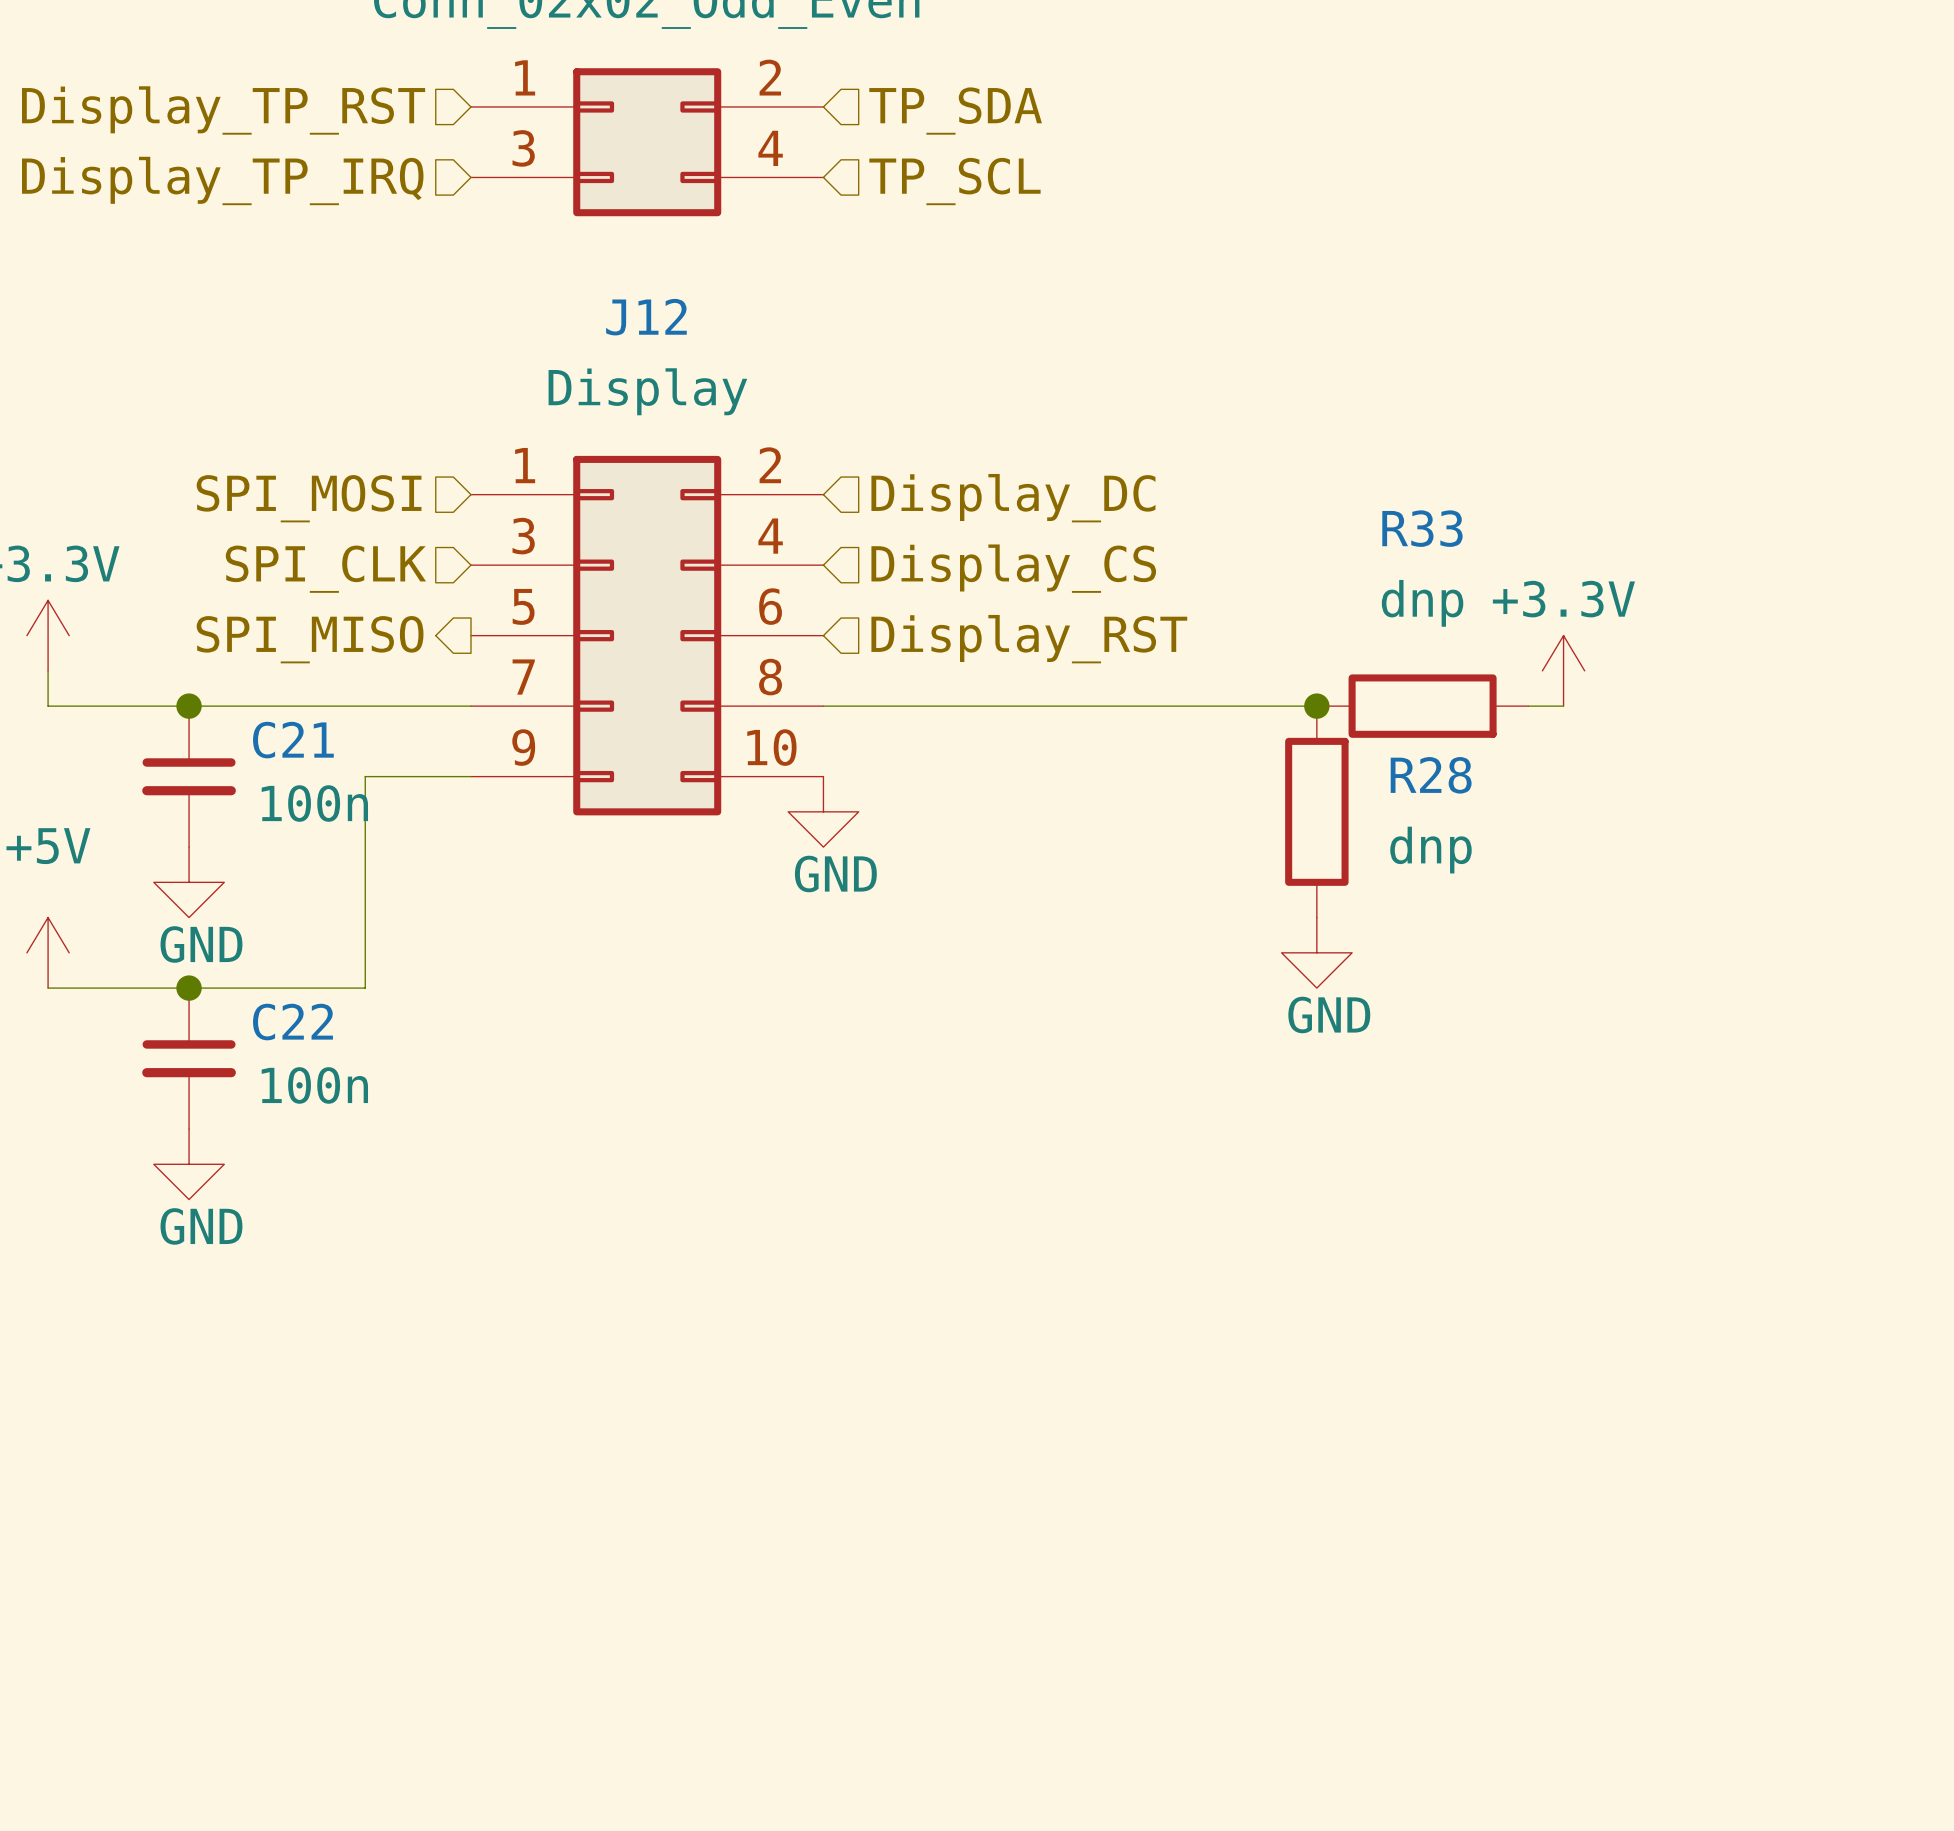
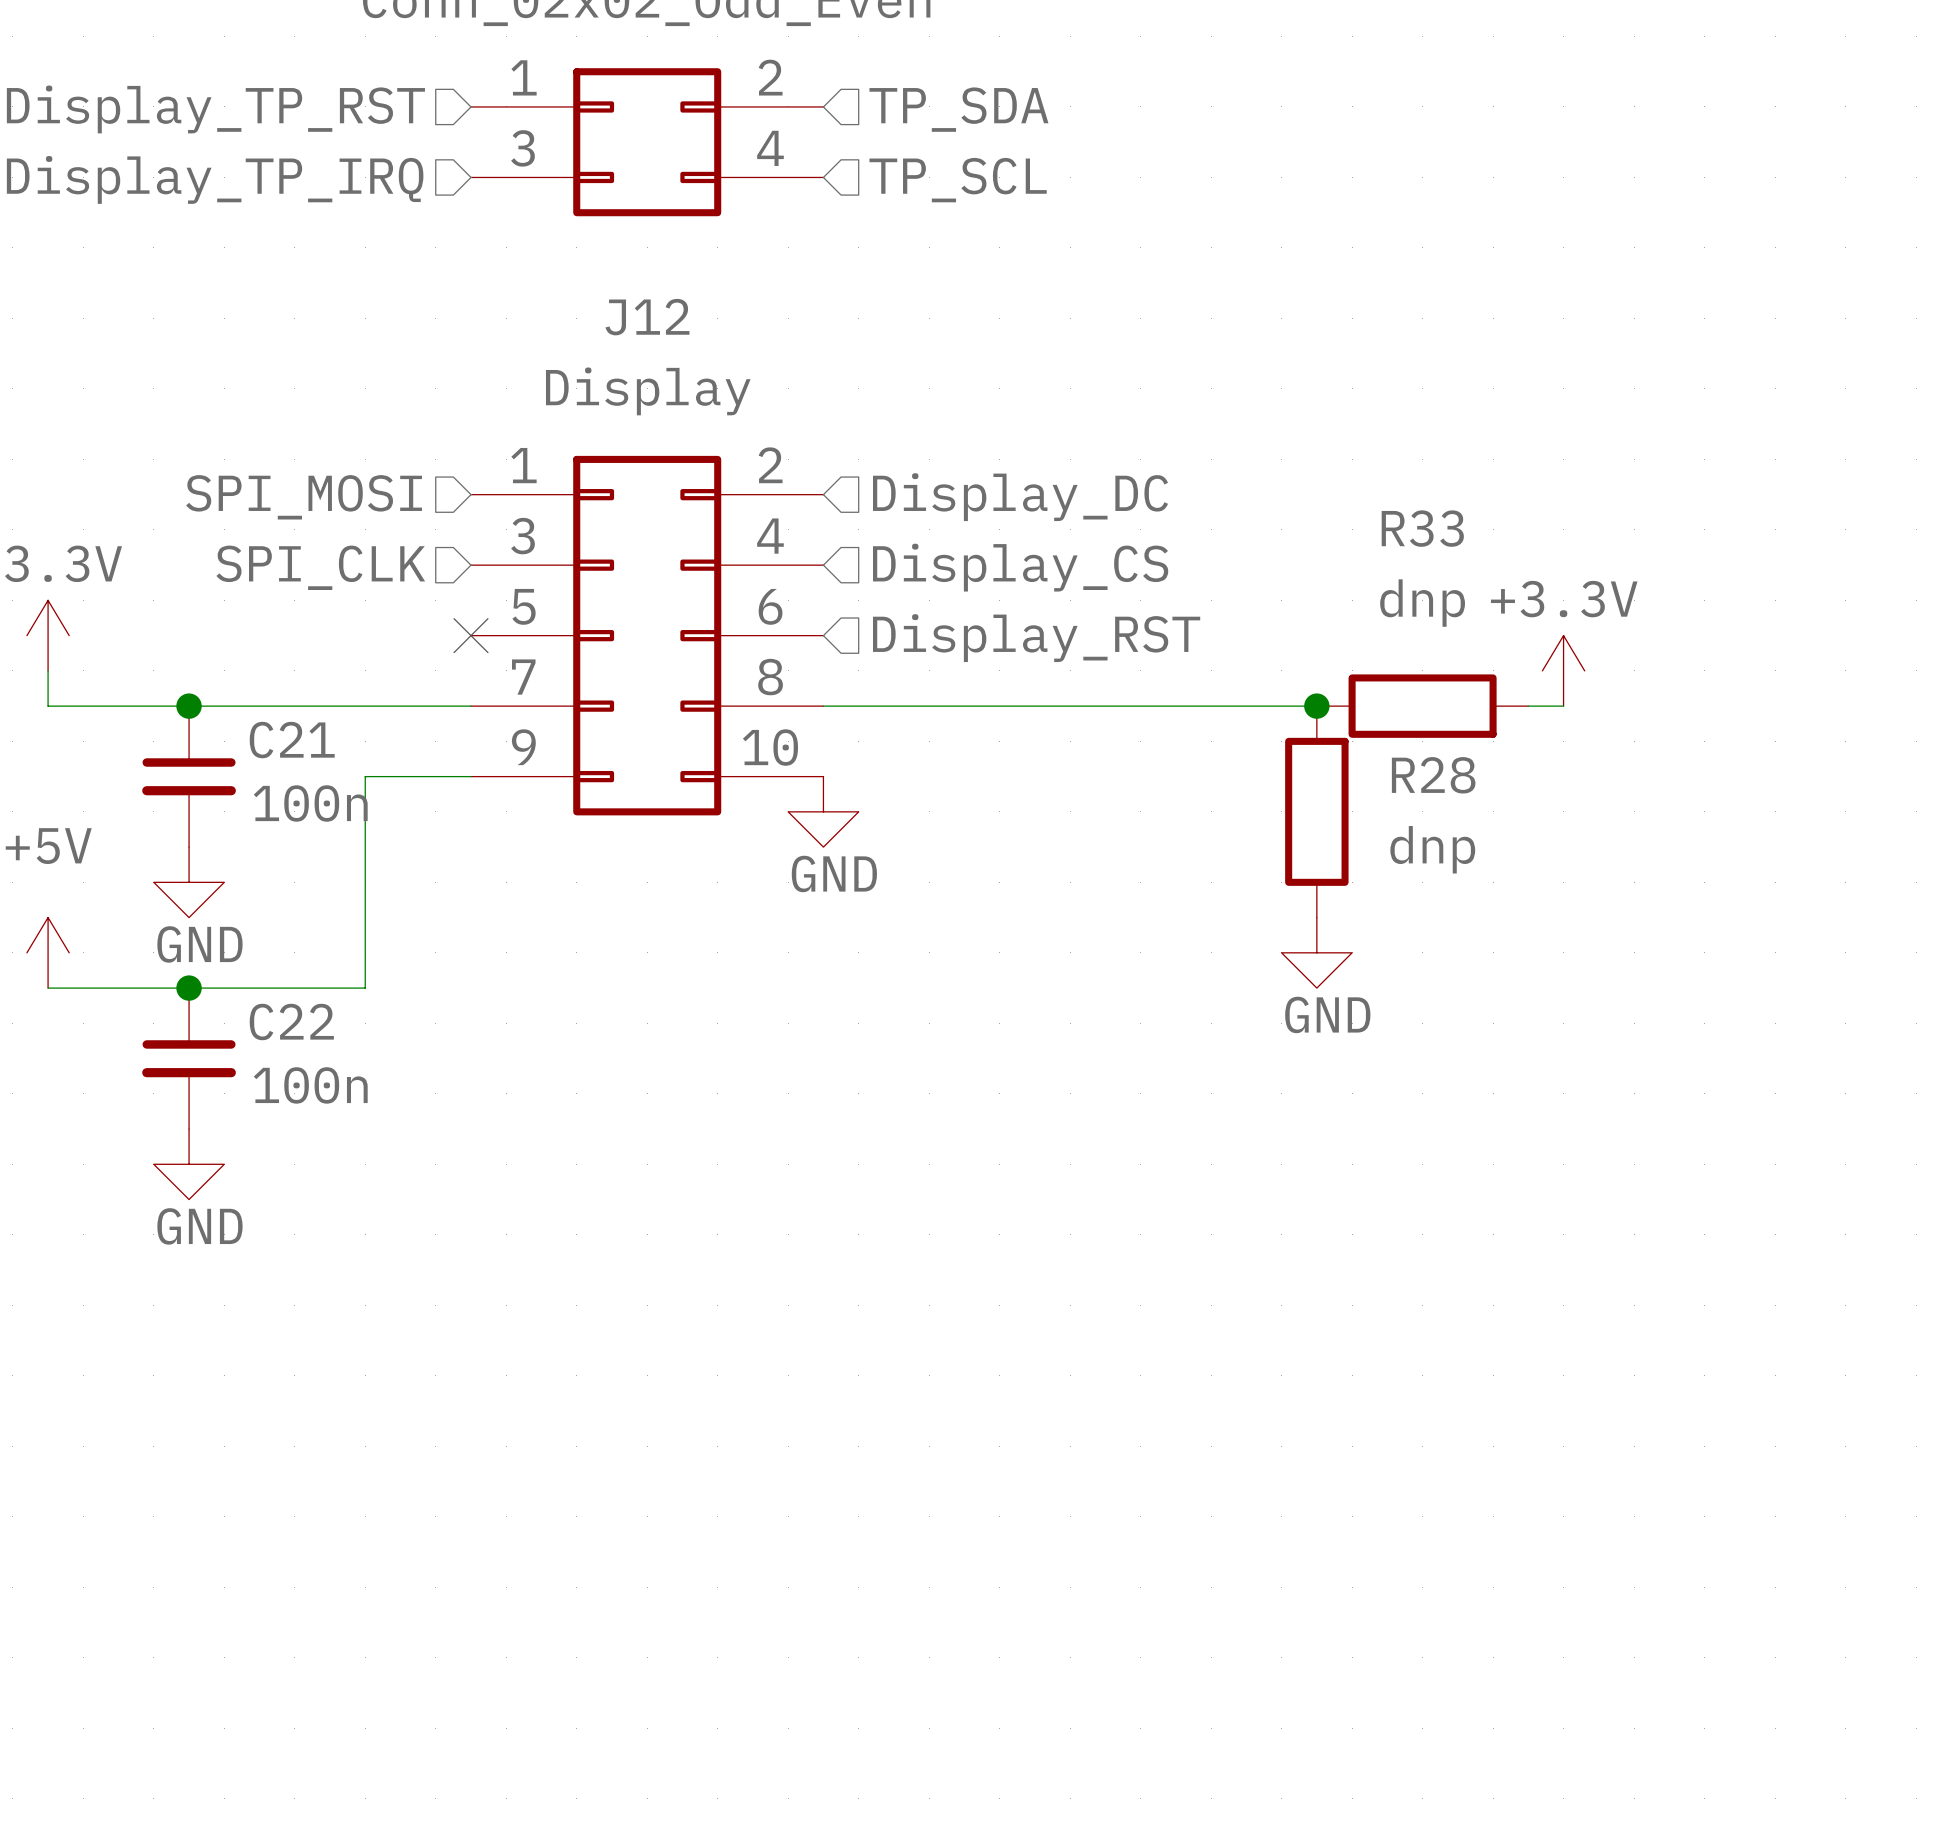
no-connect mark: none -> (470, 635)
hierarchical label: SPI_MISO (310, 639) -> none

